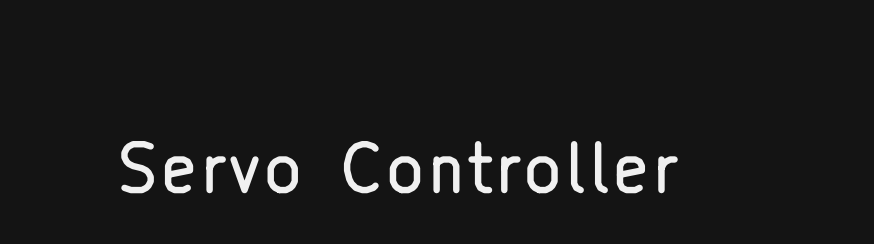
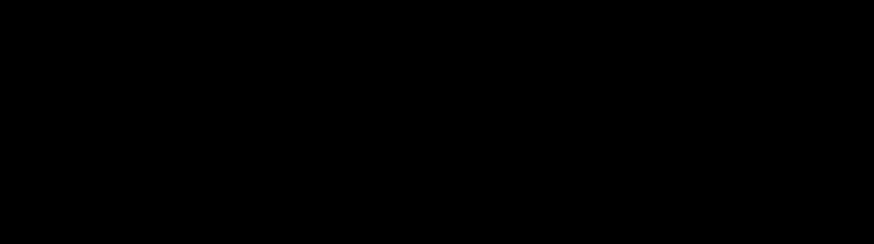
text: Servo Controller (399, 167) -> none

